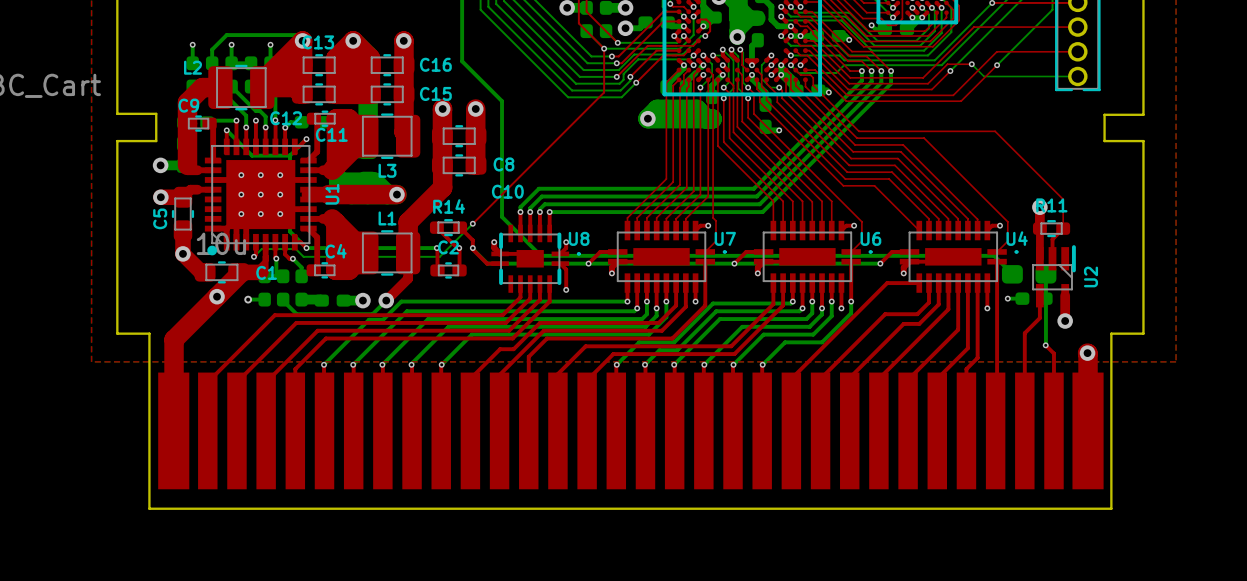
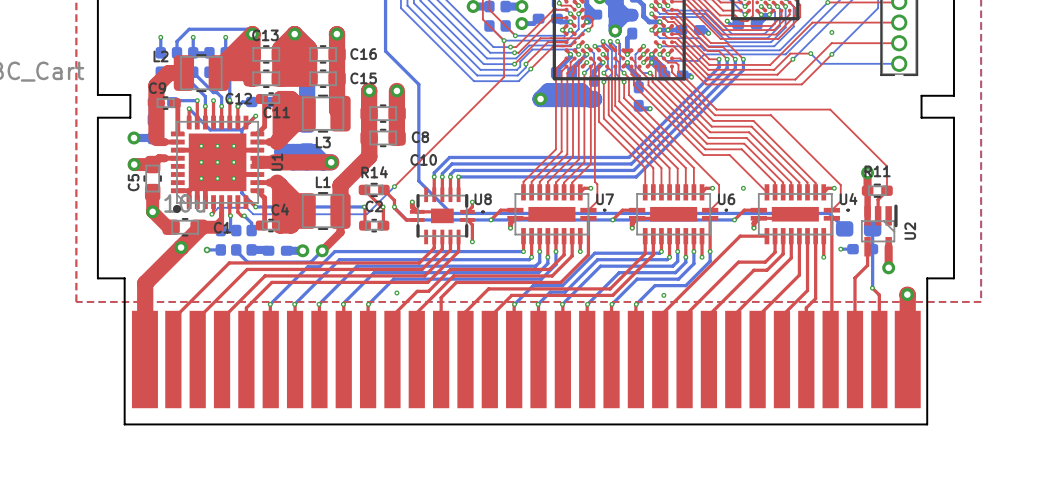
via: none -> (831, 32)
via: none -> (743, 188)
via: none -> (396, 292)
via: none -> (663, 295)

